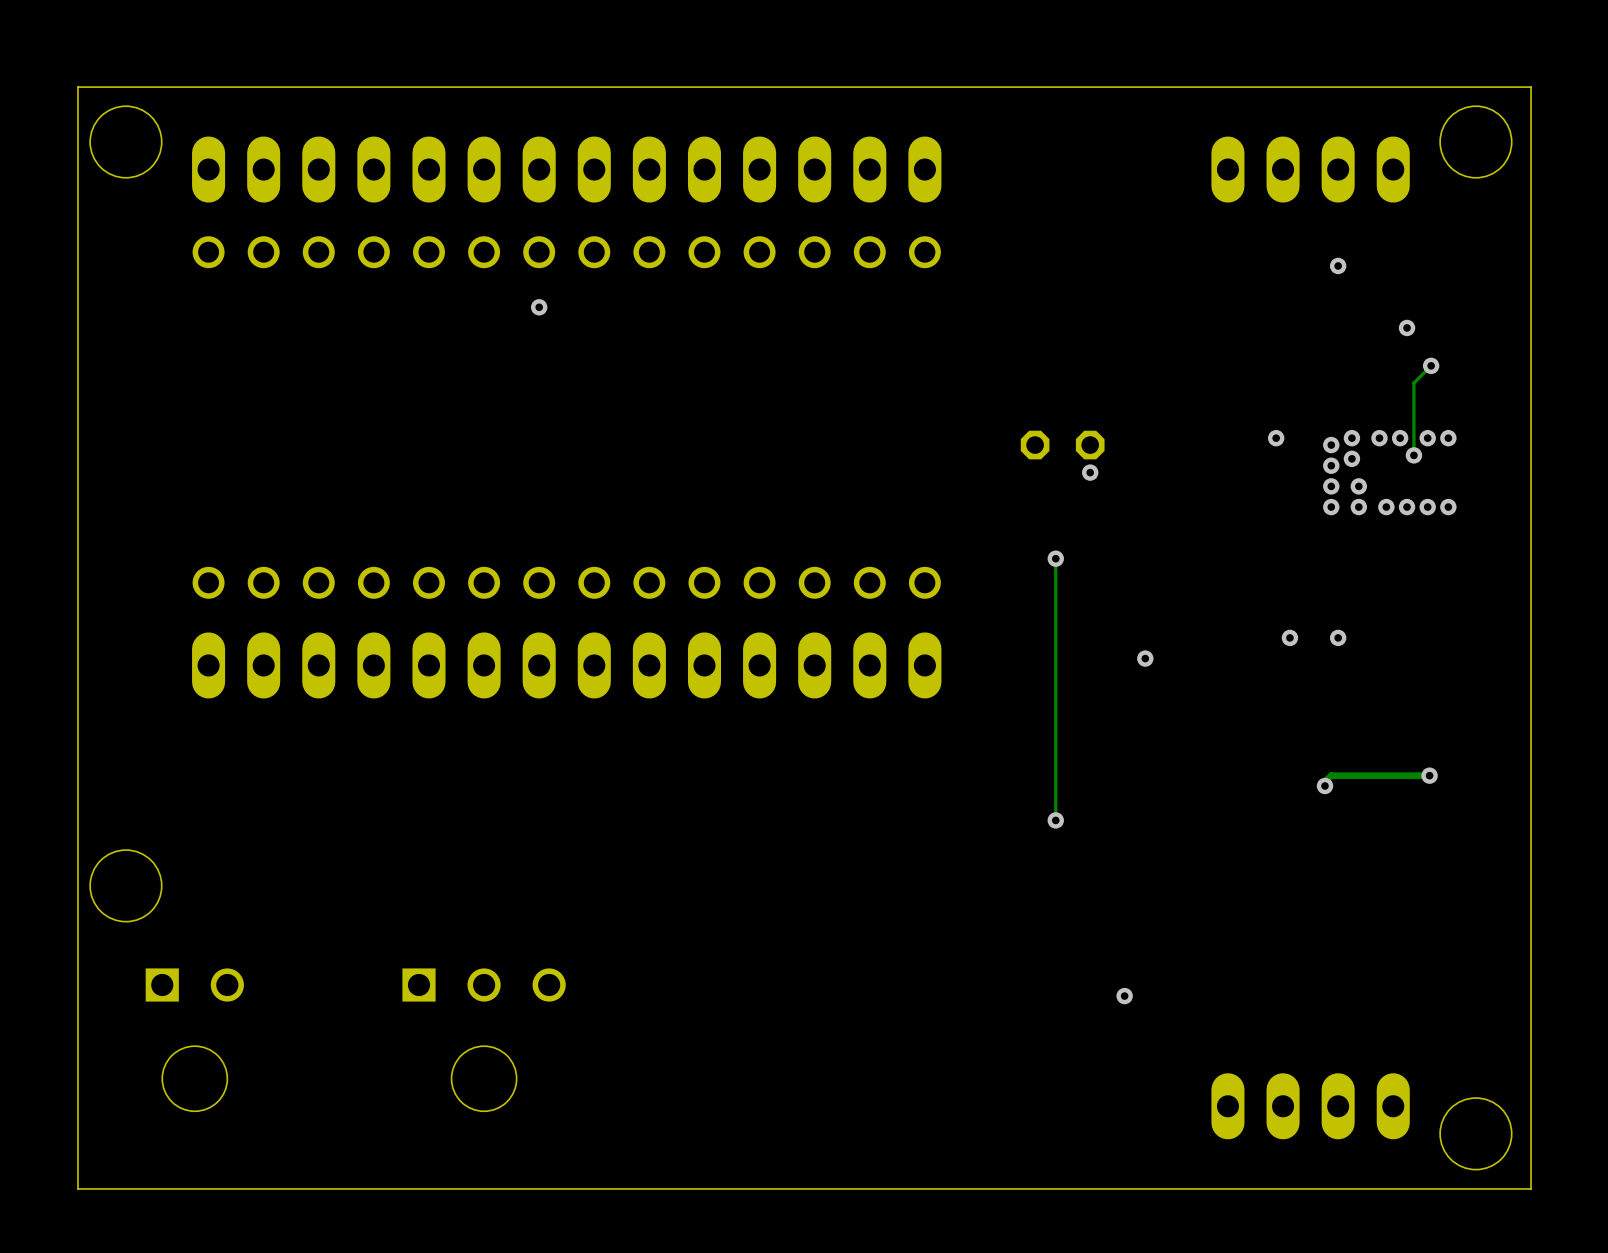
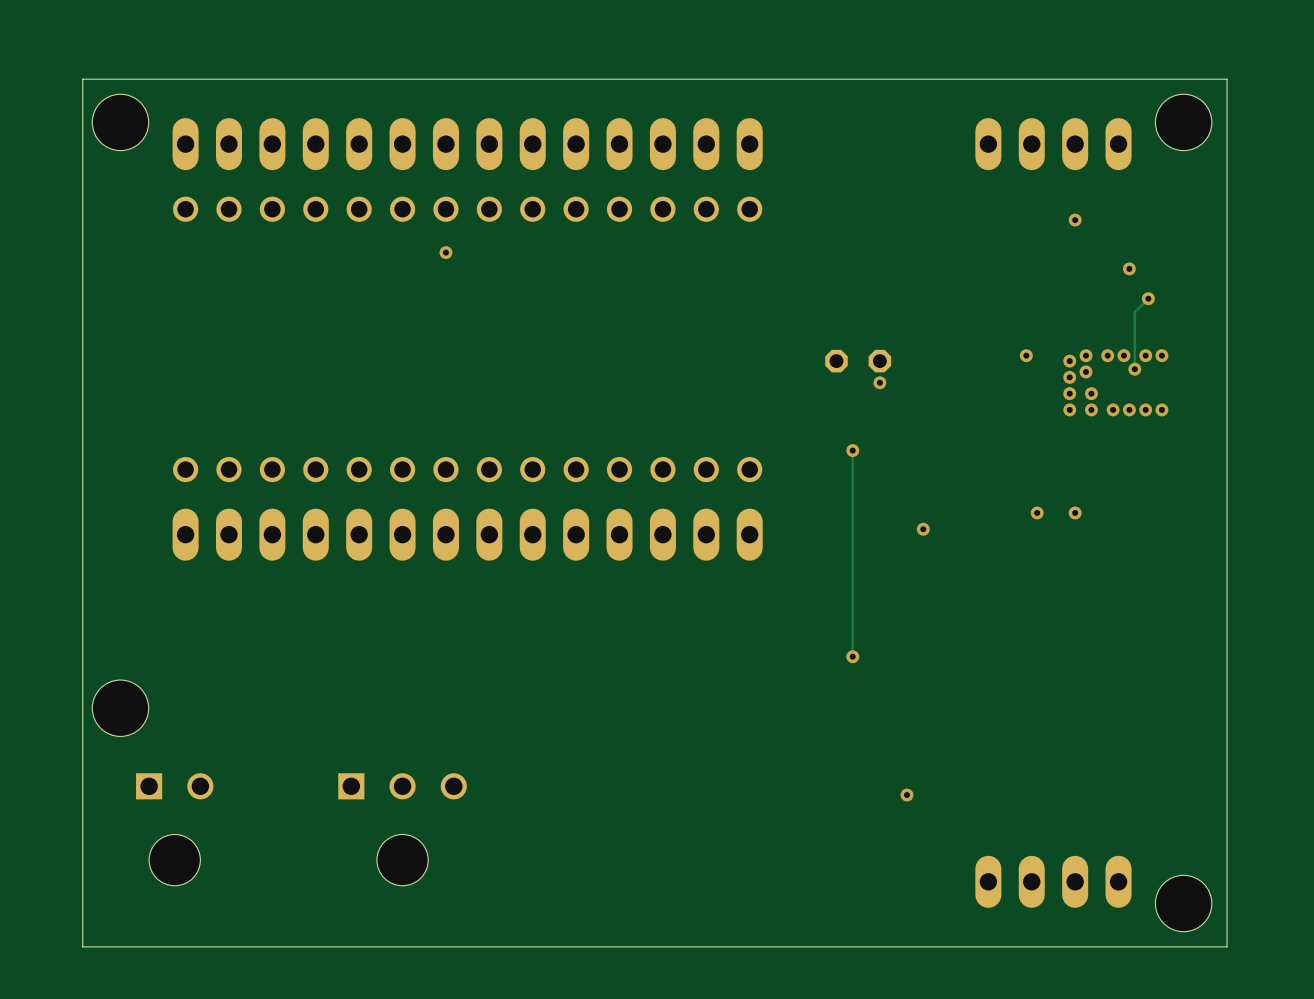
track: (1429, 775) (1331, 775) (1324, 782) (1325, 785) -> none
via: (1429, 775) -> none
via: (1325, 785) -> none

